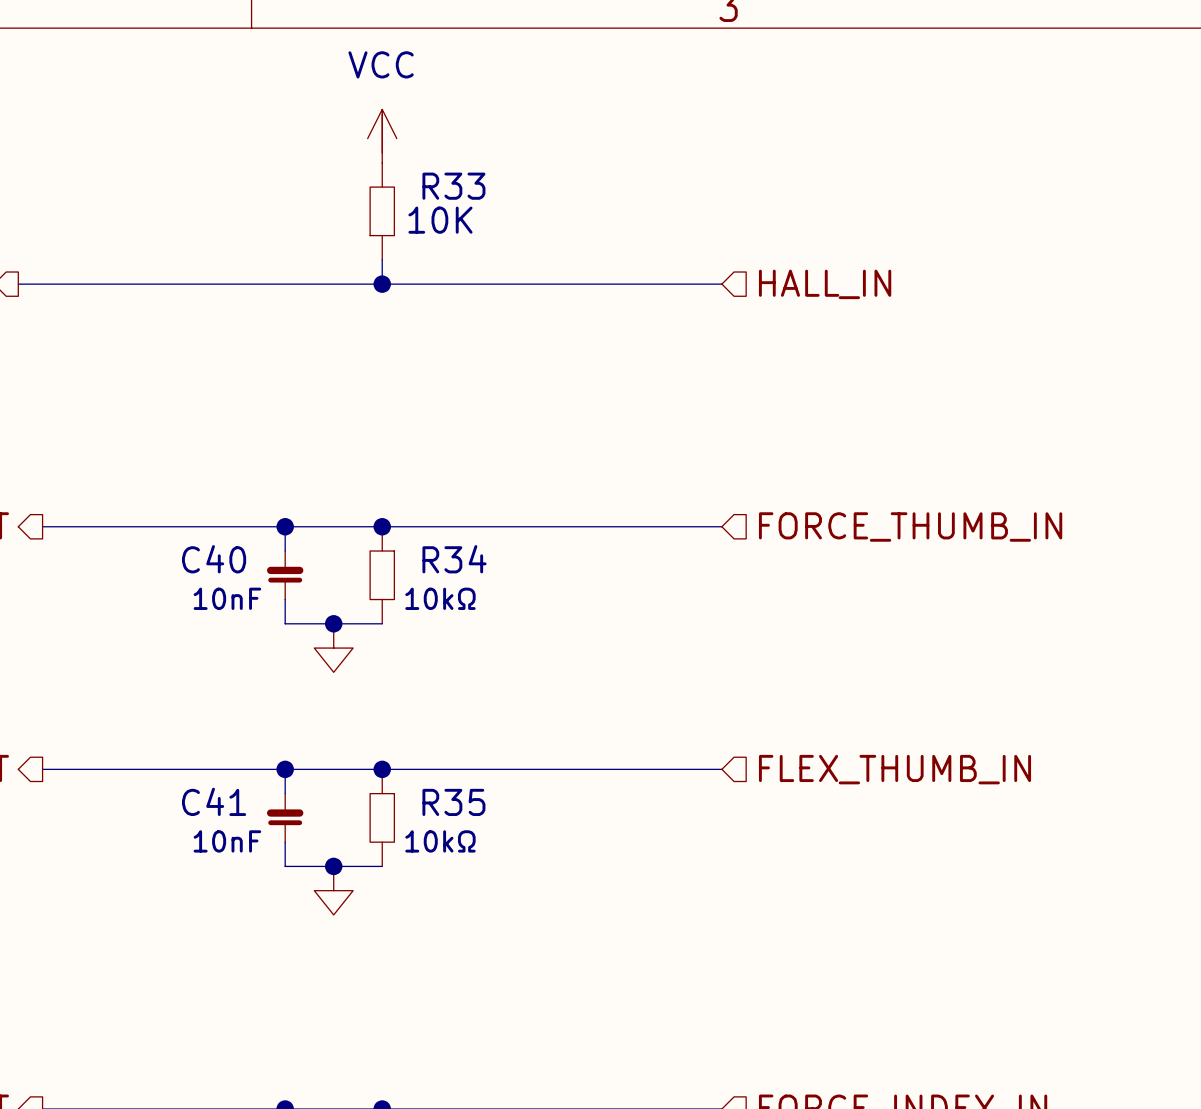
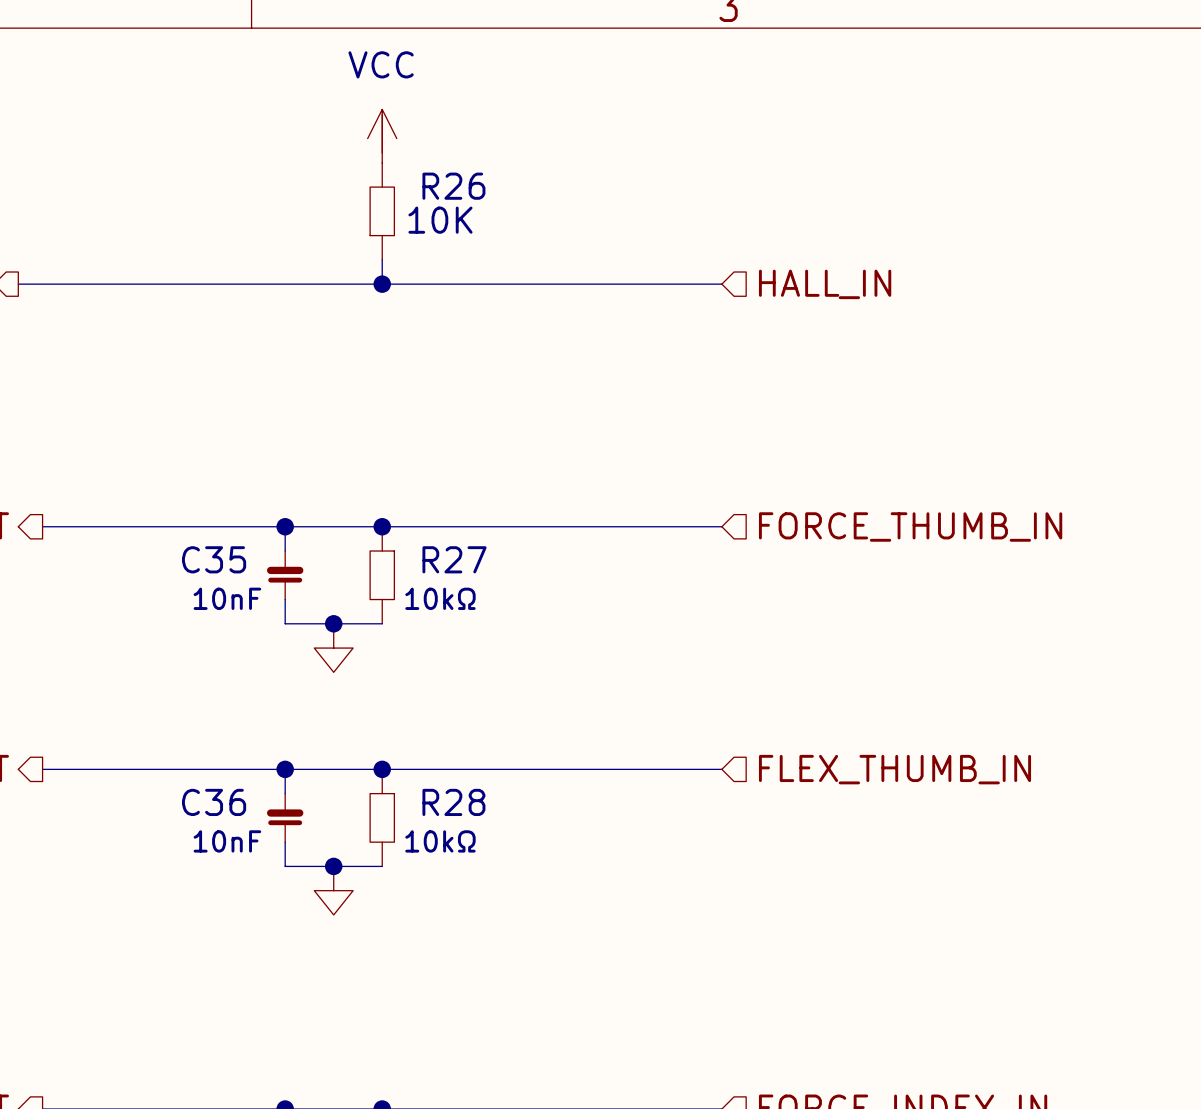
R33 name: R33 (453, 186) -> R26 (453, 186)
C40 name: C40 (214, 559) -> C35 (214, 559)
R34 name: R34 (454, 559) -> R27 (454, 559)
C41 name: C41 (214, 801) -> C36 (214, 802)
R35 name: R35 (453, 802) -> R28 (453, 802)

